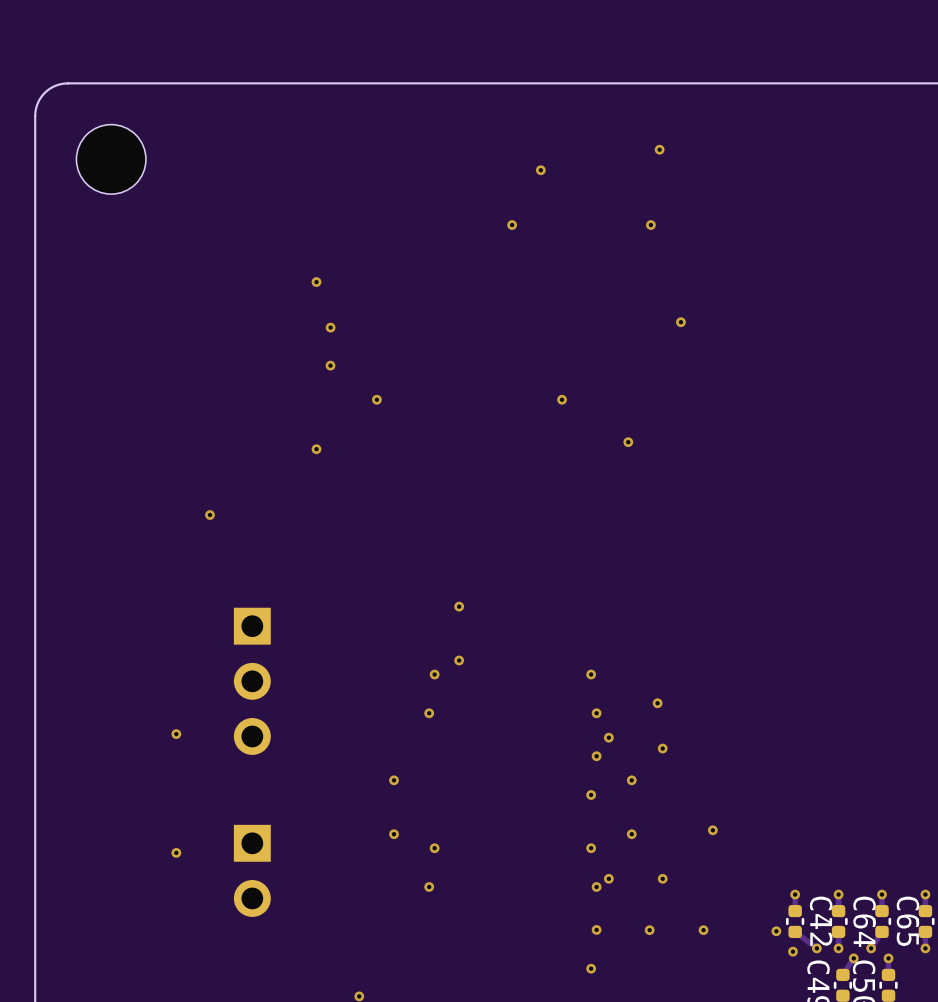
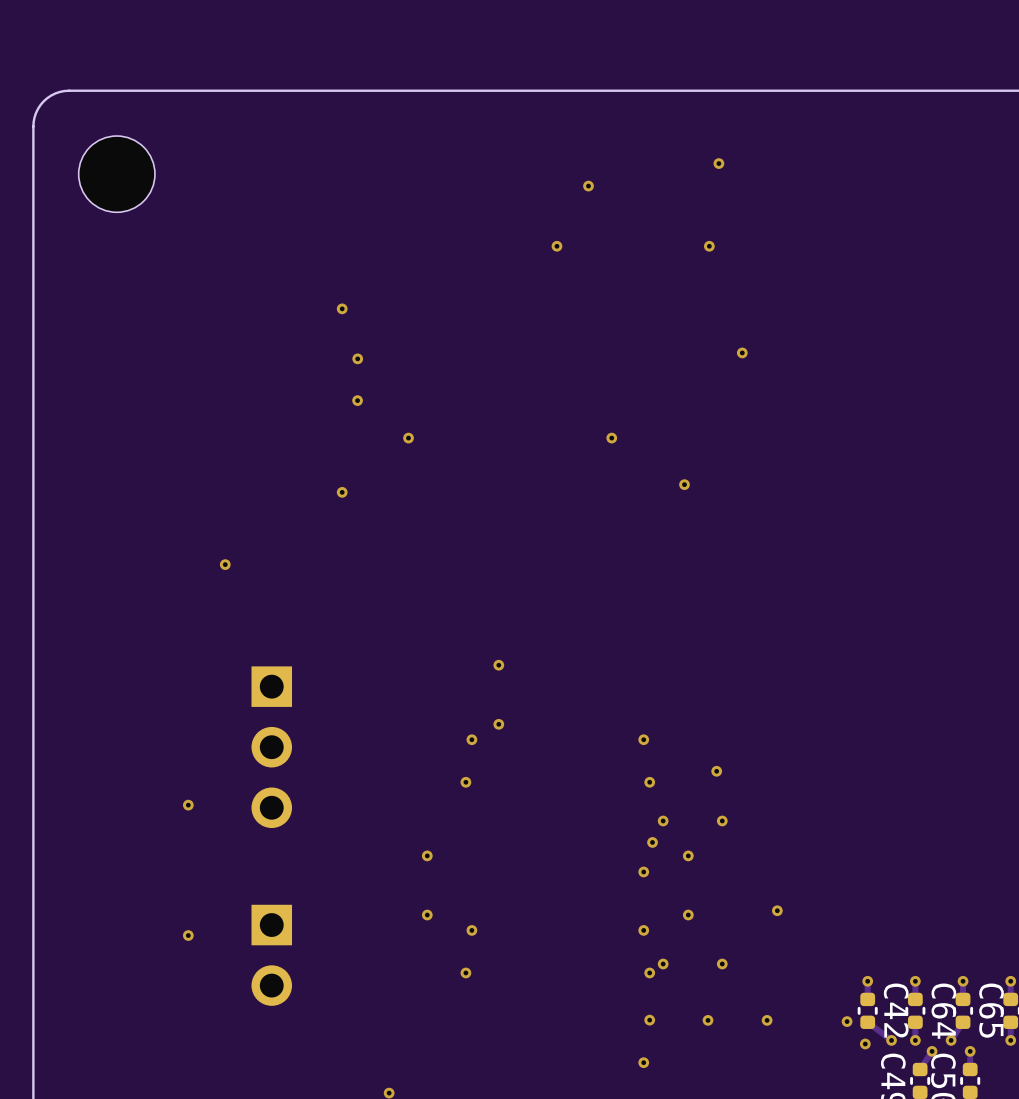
via: (608, 737) -> none
via: none -> (663, 820)
via: (596, 756) -> none
via: none -> (652, 842)

